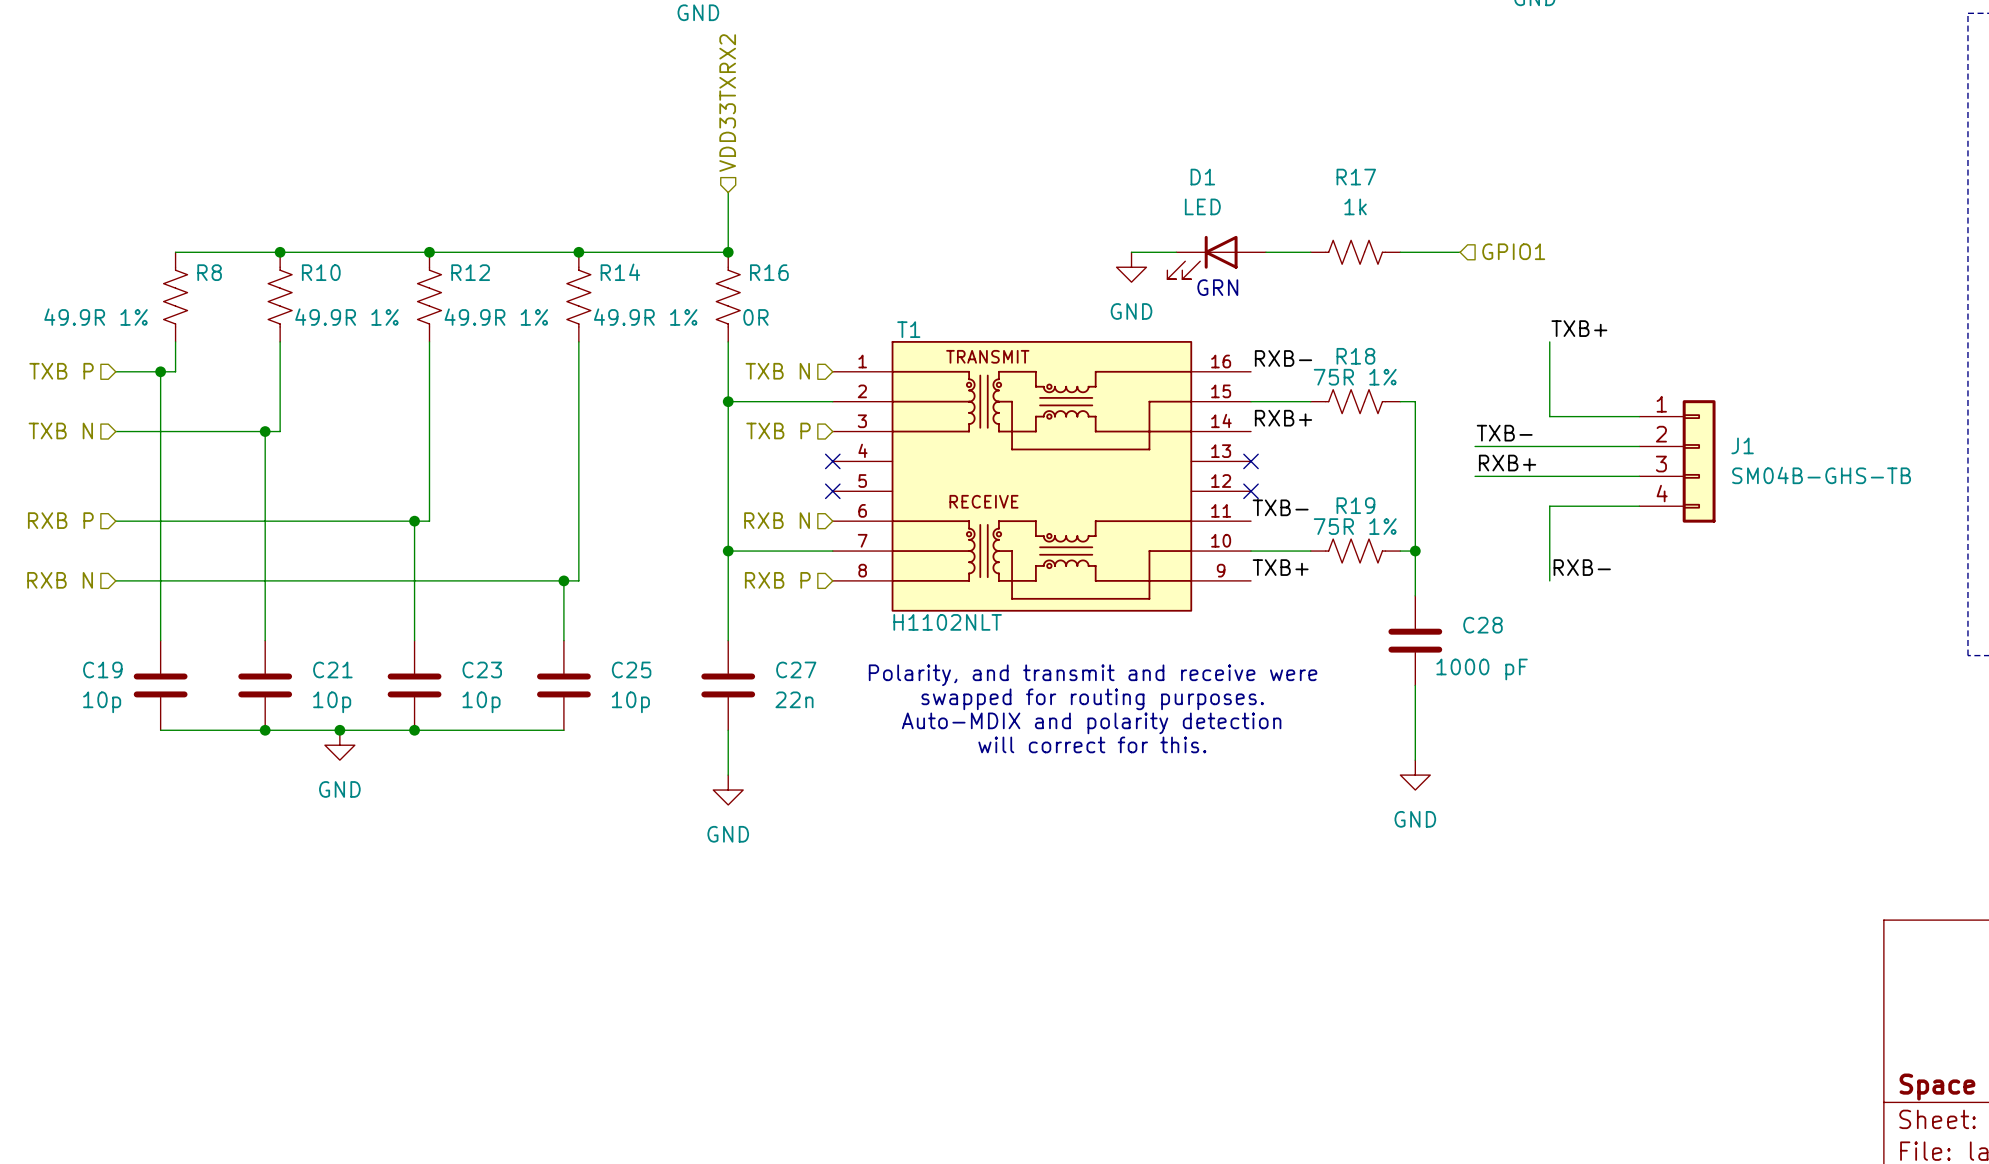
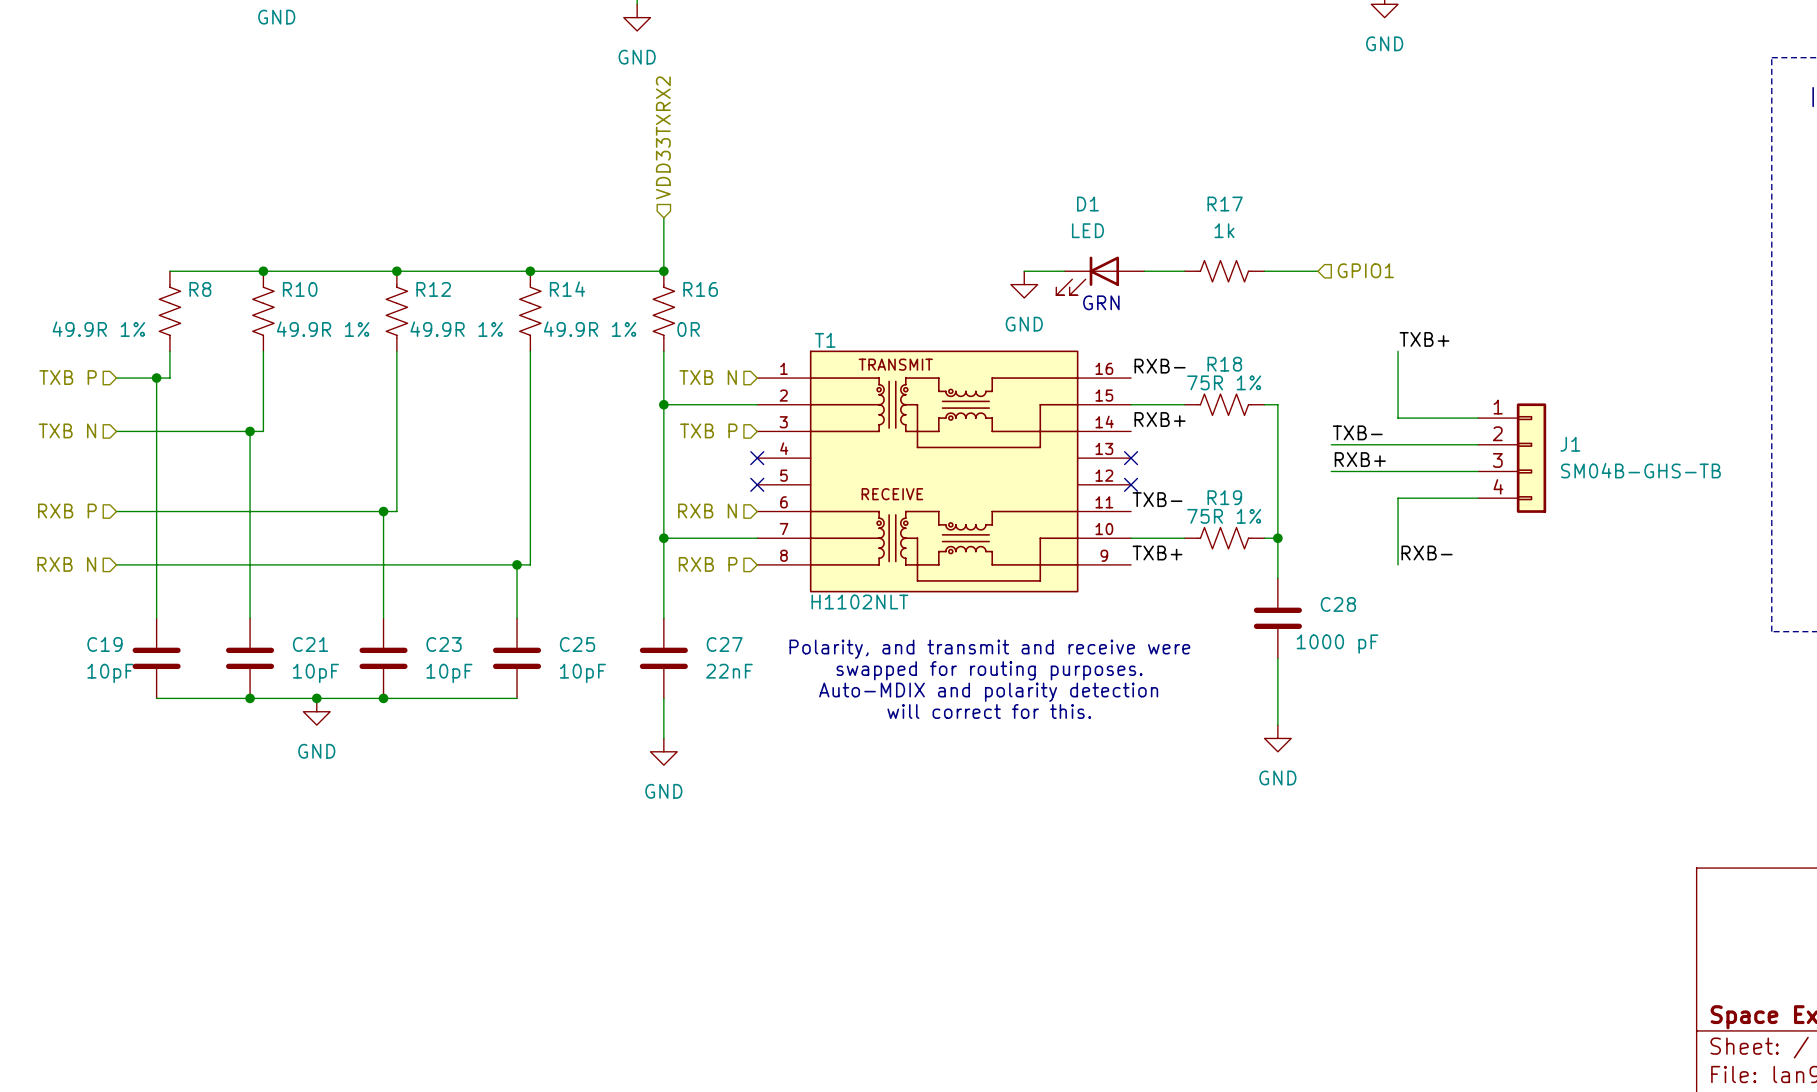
C27 value: 22n (794, 699) -> 22nF (729, 671)
C19 value: 10p (102, 702) -> 10pF (110, 673)
C21 value: 10p (332, 702) -> 10pF (315, 673)
C23 value: 10p (481, 702) -> 10pF (449, 673)
C25 value: 10p (630, 702) -> 10pF (582, 673)

